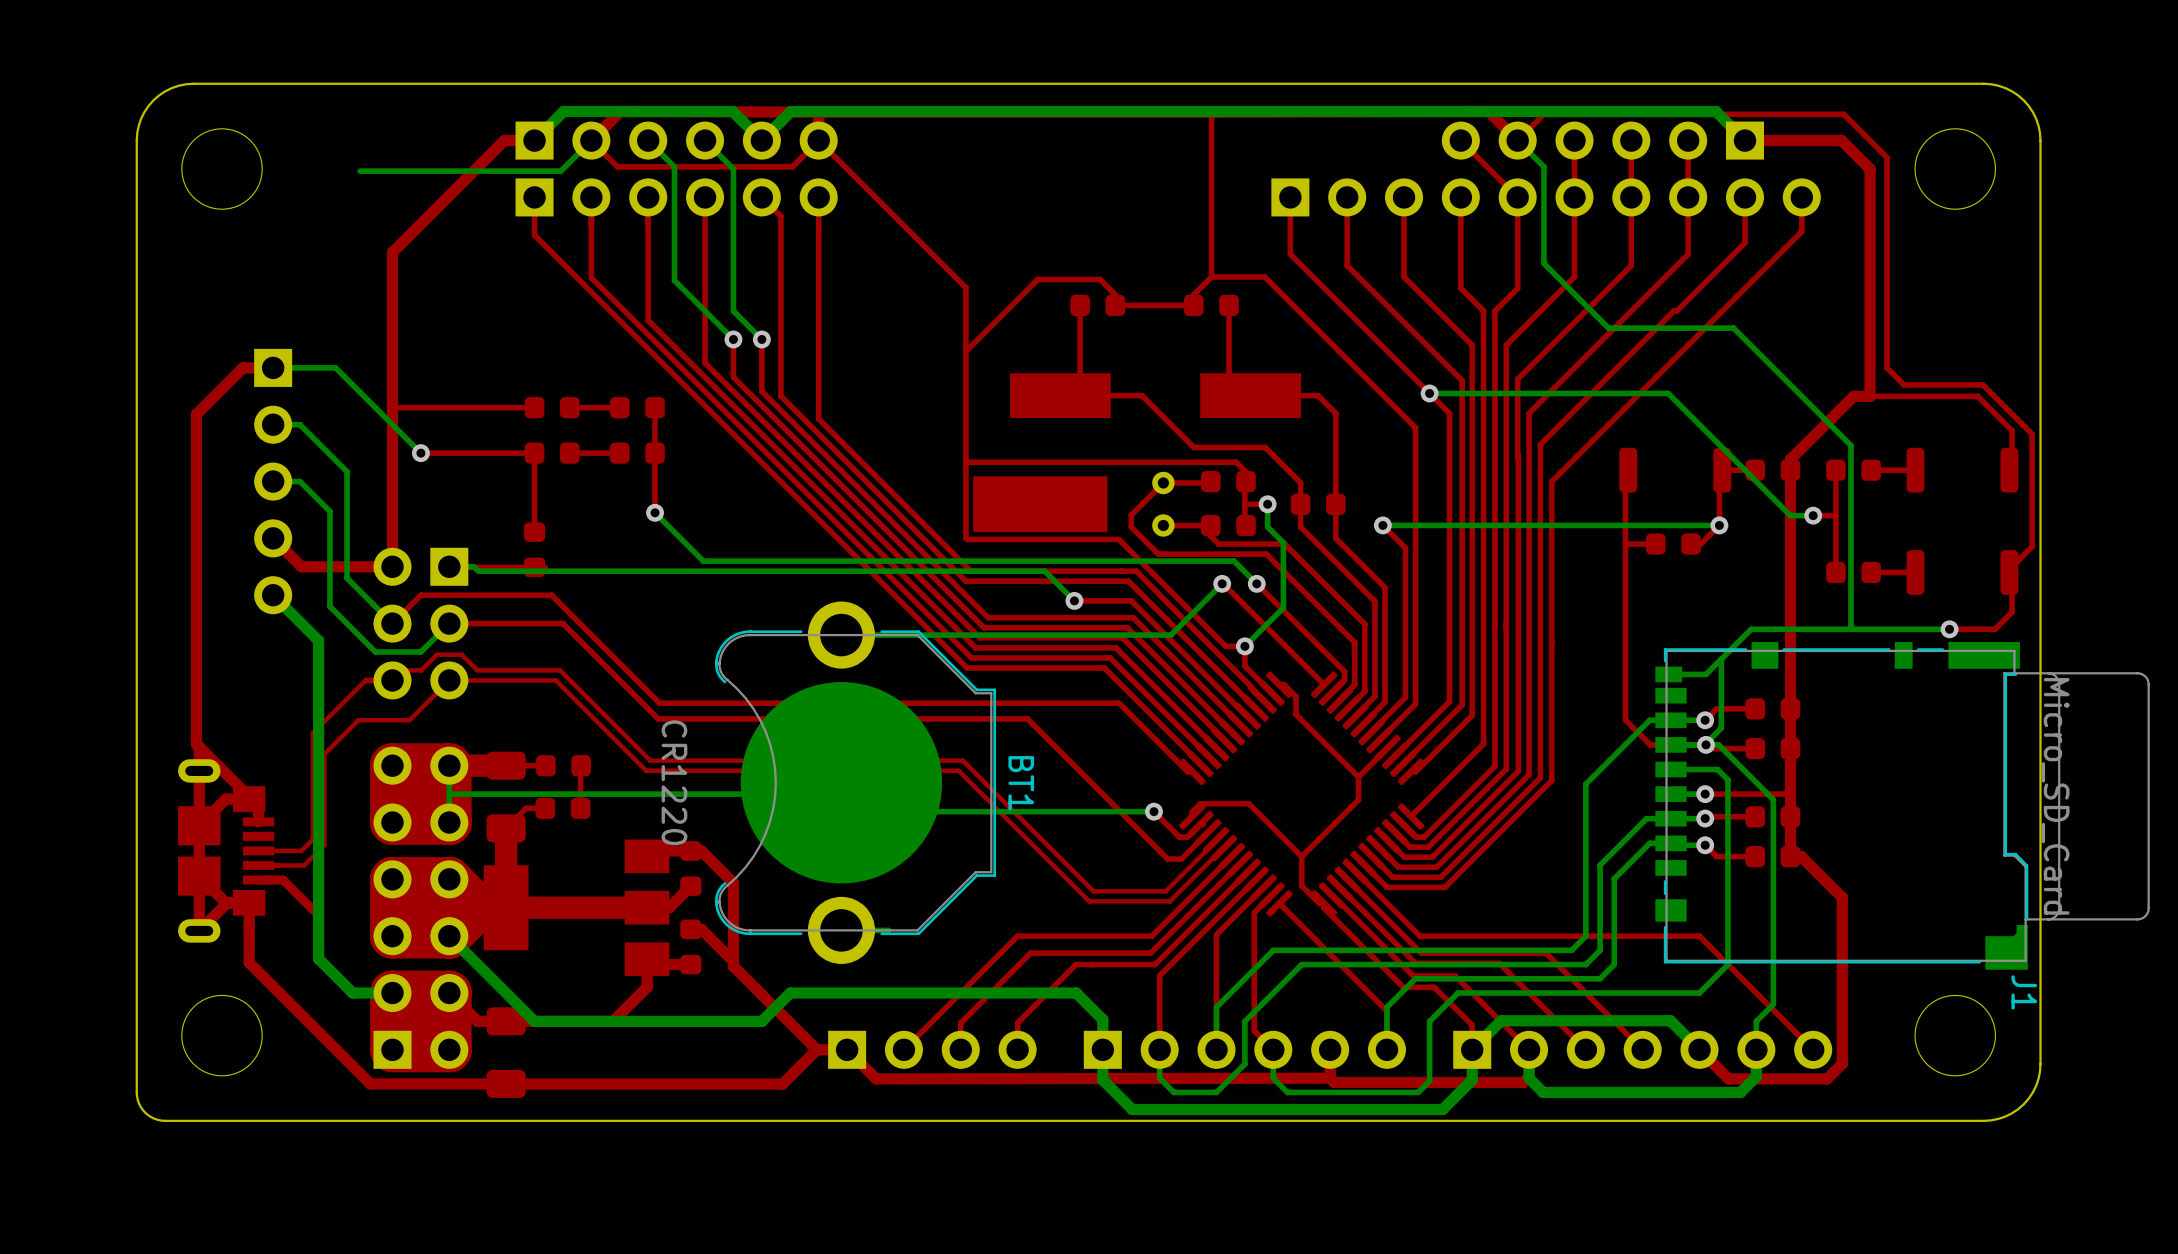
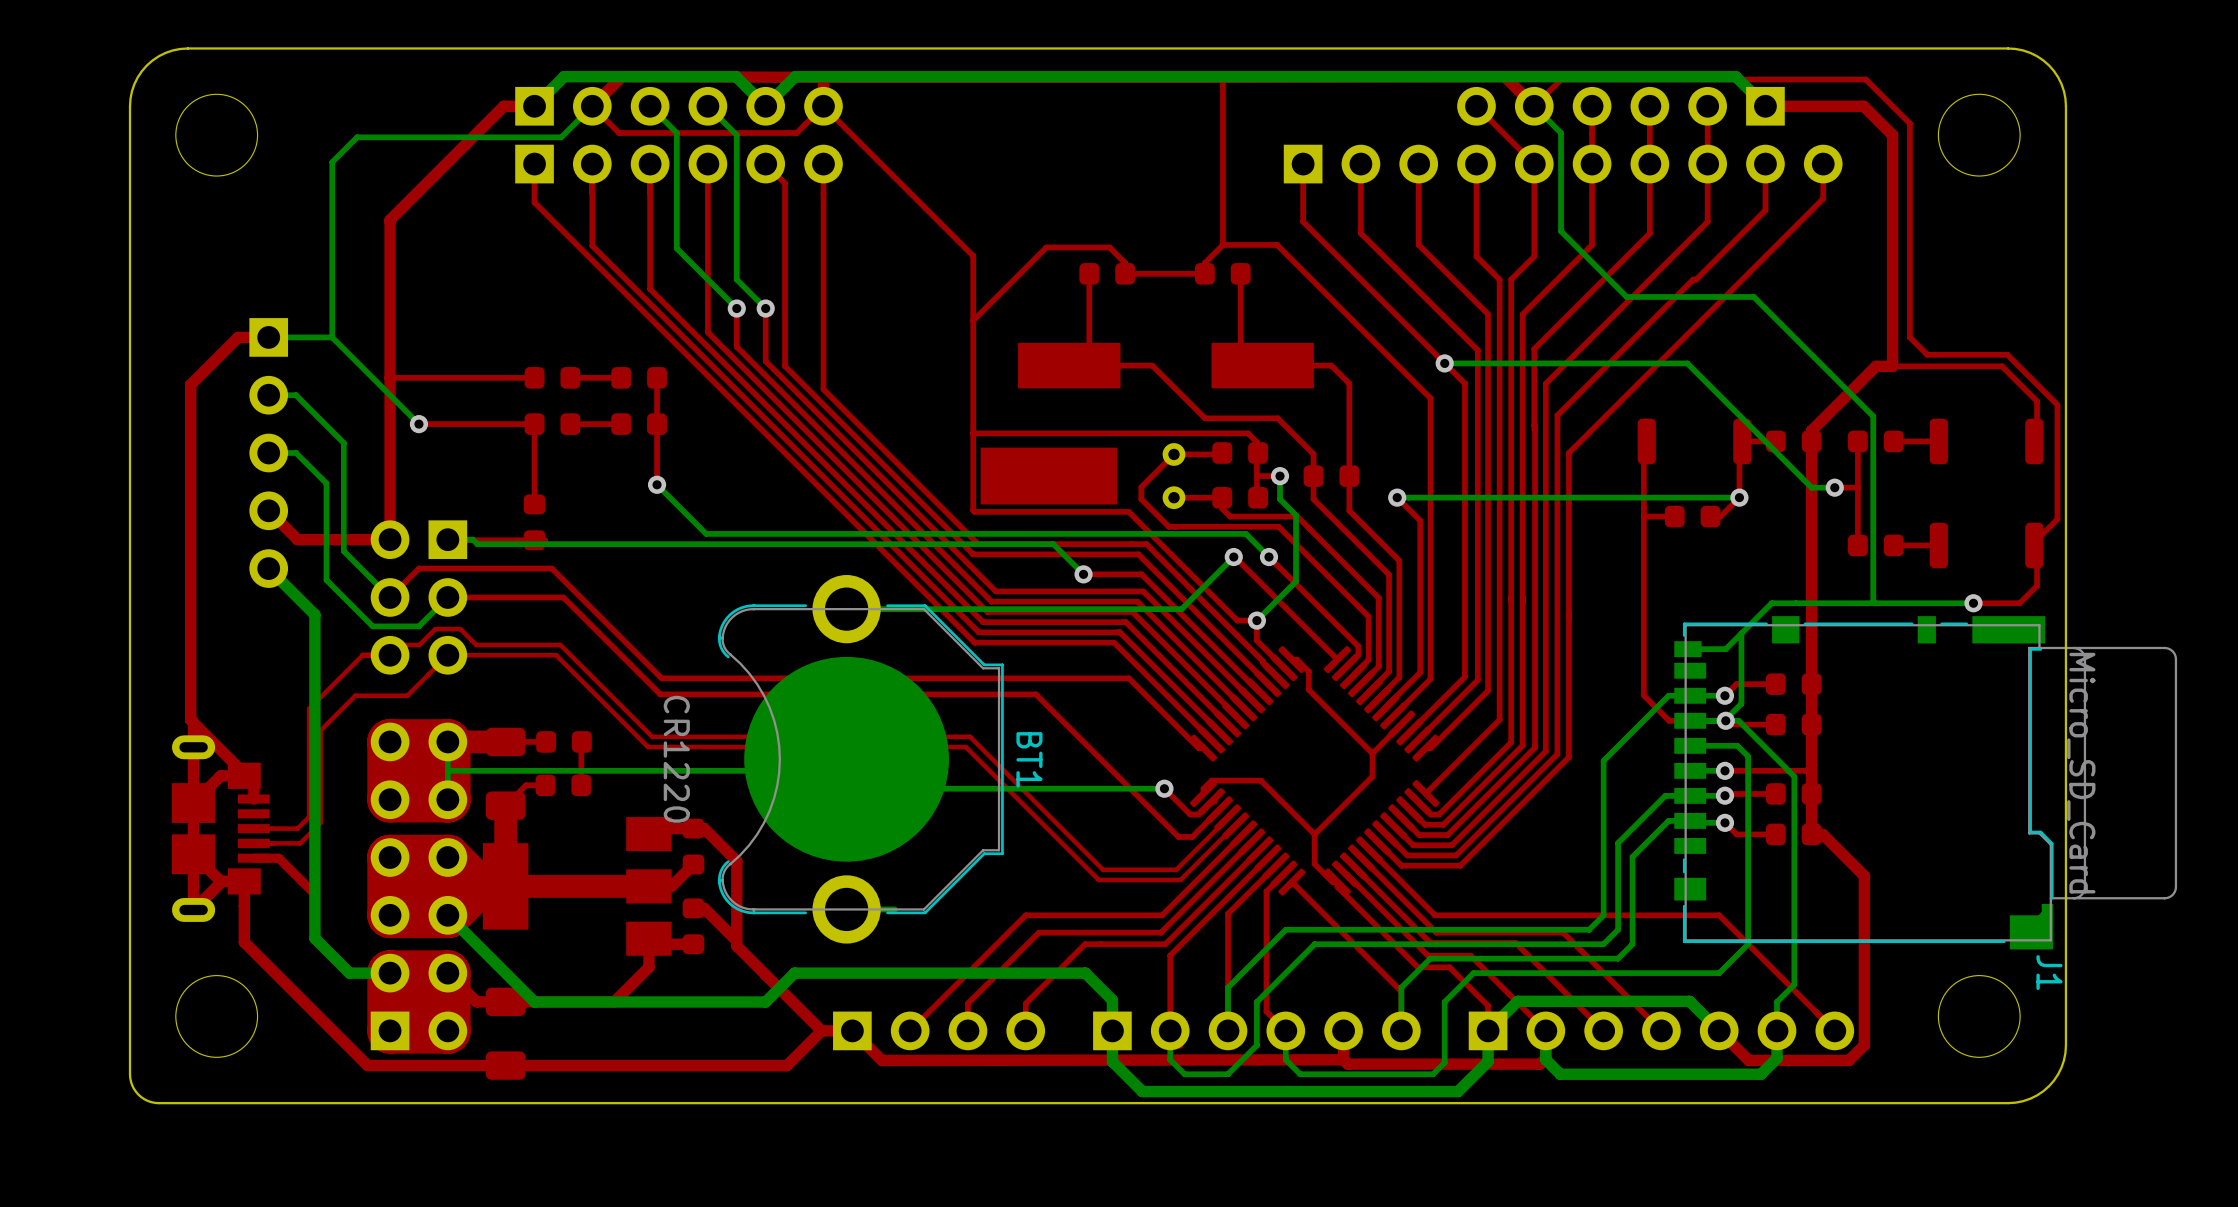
bottom track: none -> (357, 137) (332, 162) (332, 337)

